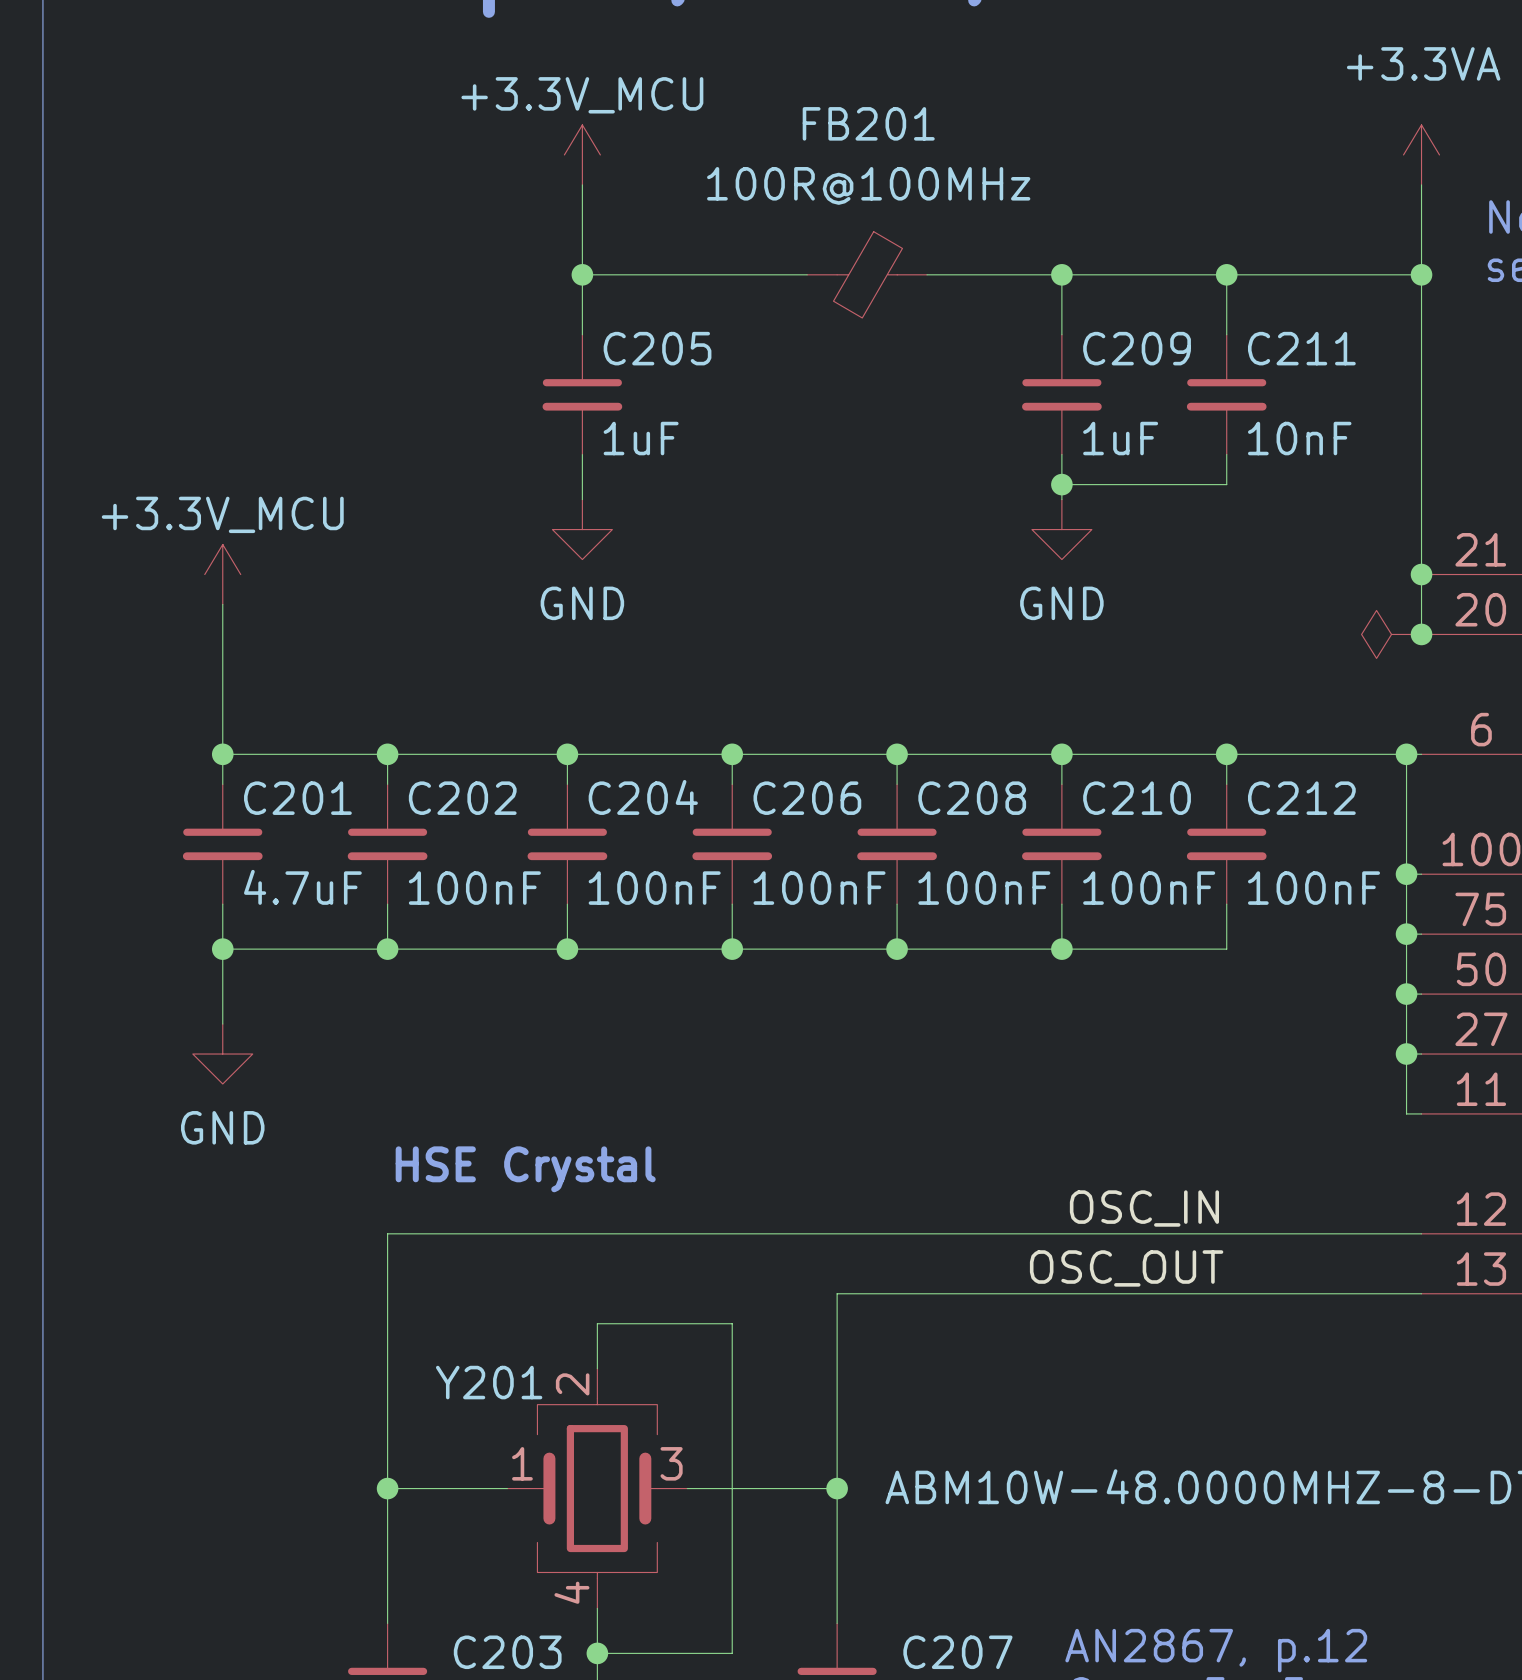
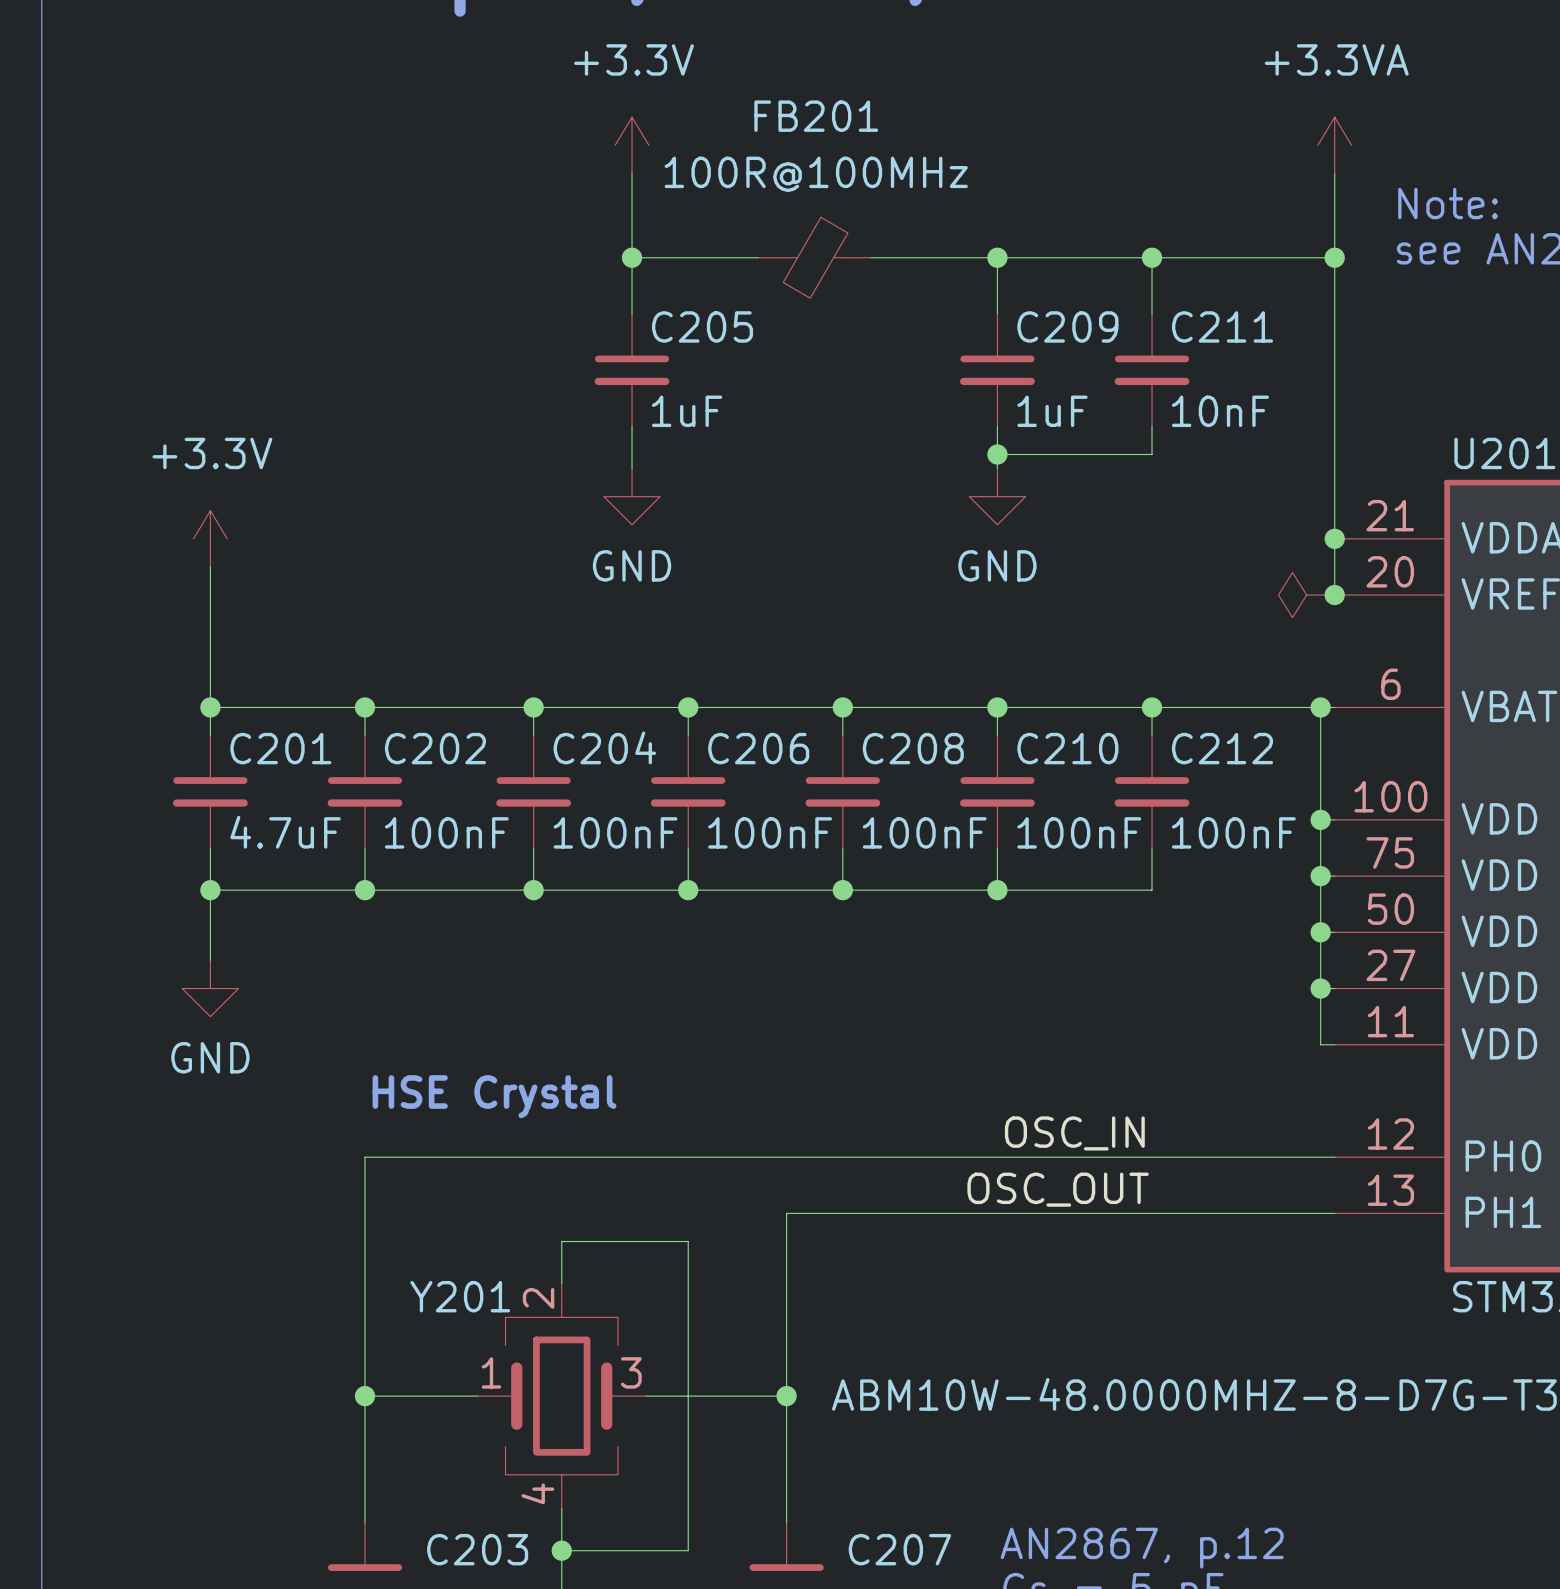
power symbol: +3.3V_MCU (582, 154) -> none
power symbol: none -> +3.3V (632, 145)
wire: (582, 184) (582, 334) -> (632, 173) (632, 313)
wire: (582, 274) (672, 274) -> none
junction position: (582, 274) -> (632, 257)
C205 position: (582, 394) -> (632, 370)
wire: (582, 454) (582, 499) -> (632, 426) (632, 468)
power symbol position: GND (582, 529) -> GND (632, 496)
power symbol: +3.3V_MCU (222, 574) -> +3.3V (210, 538)

